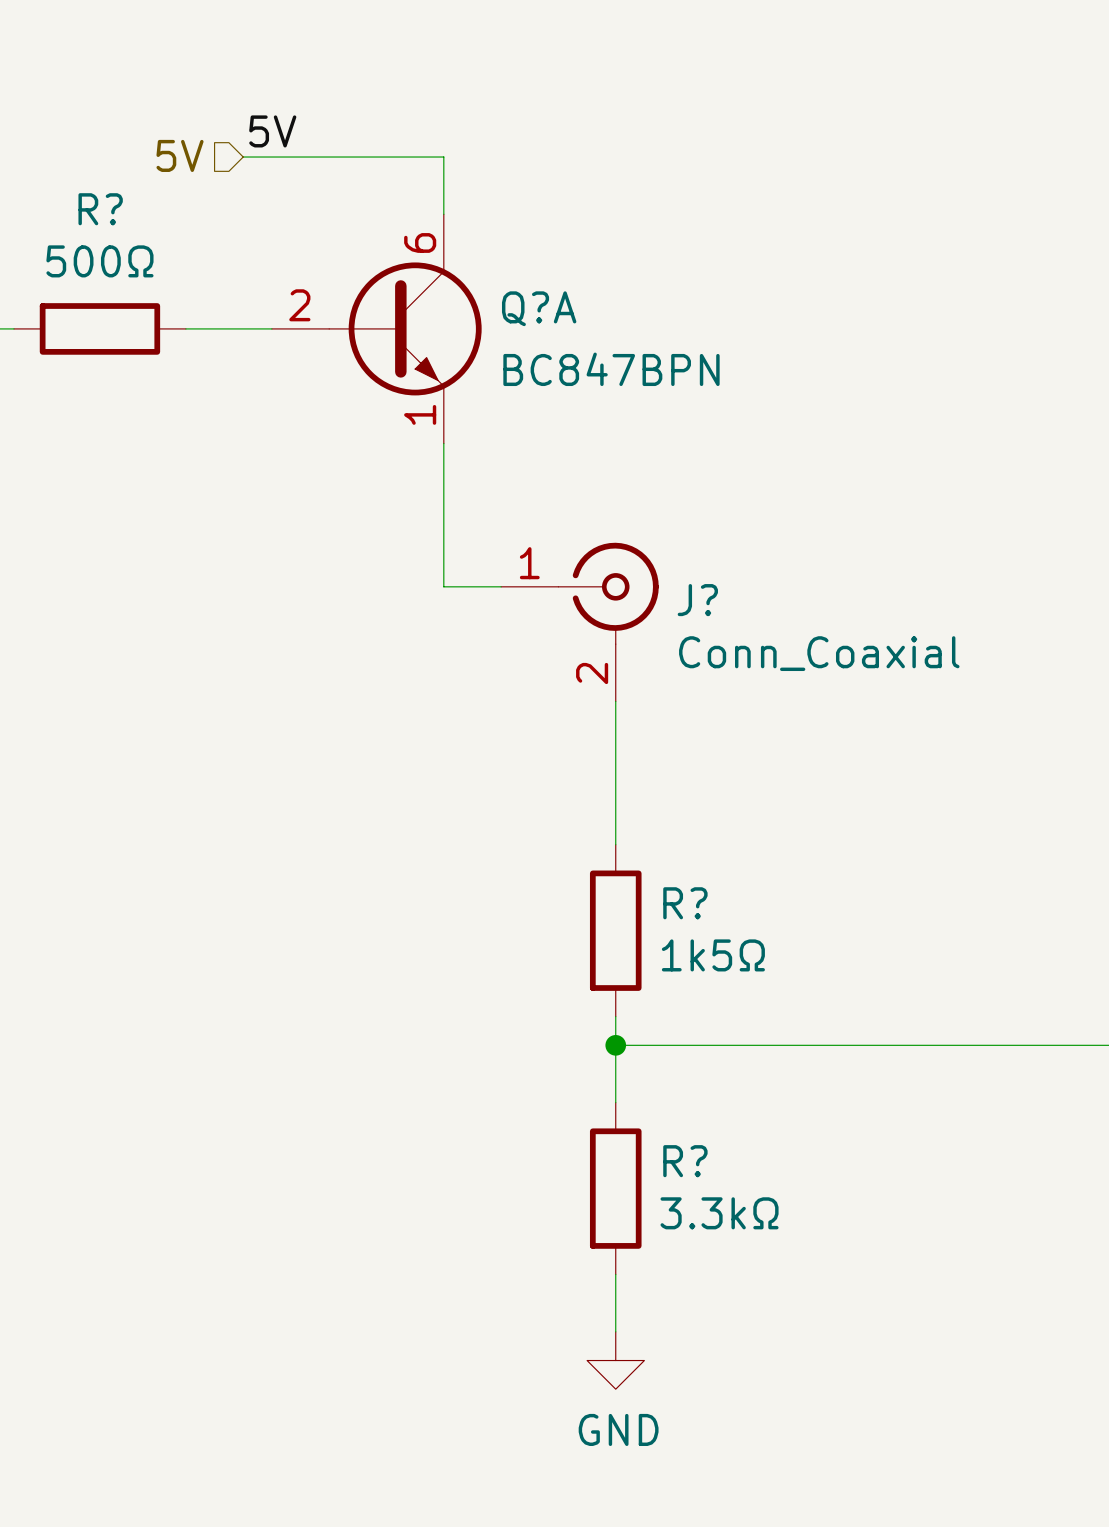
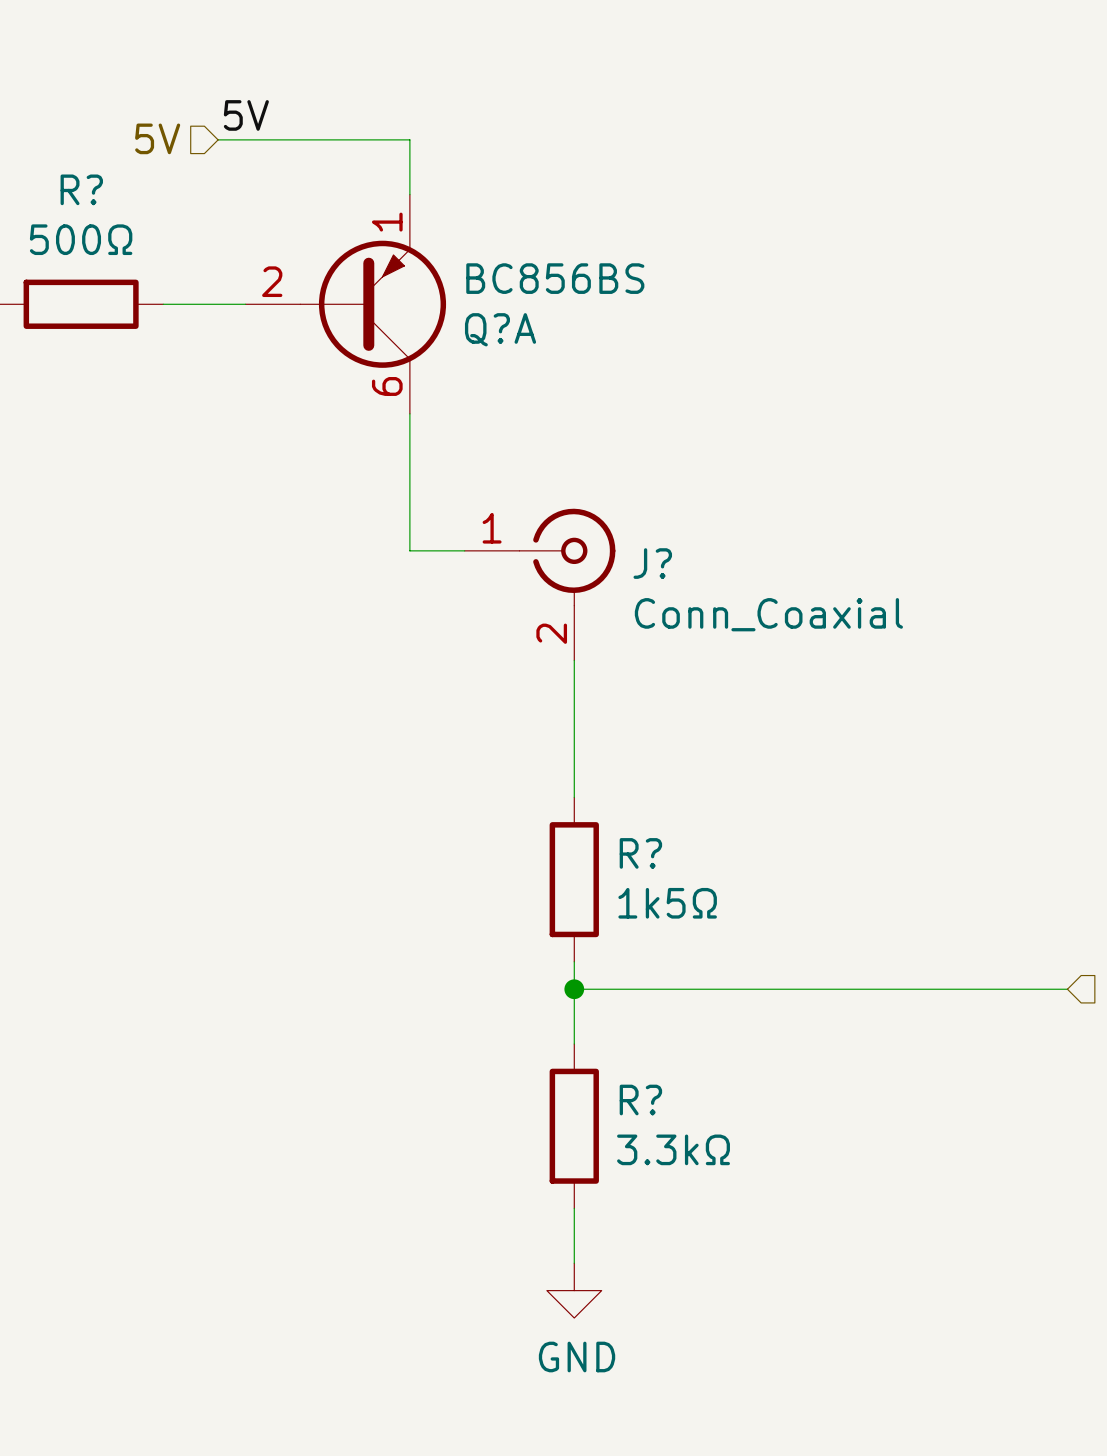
Q?A symbol: [271, 214, 482, 444] -> [245, 194, 447, 414]
Q?A name position: Q?A (539, 308) -> Q?A (500, 329)
Q?A value: BC847BPN (611, 369) -> BC856BS (555, 278)

